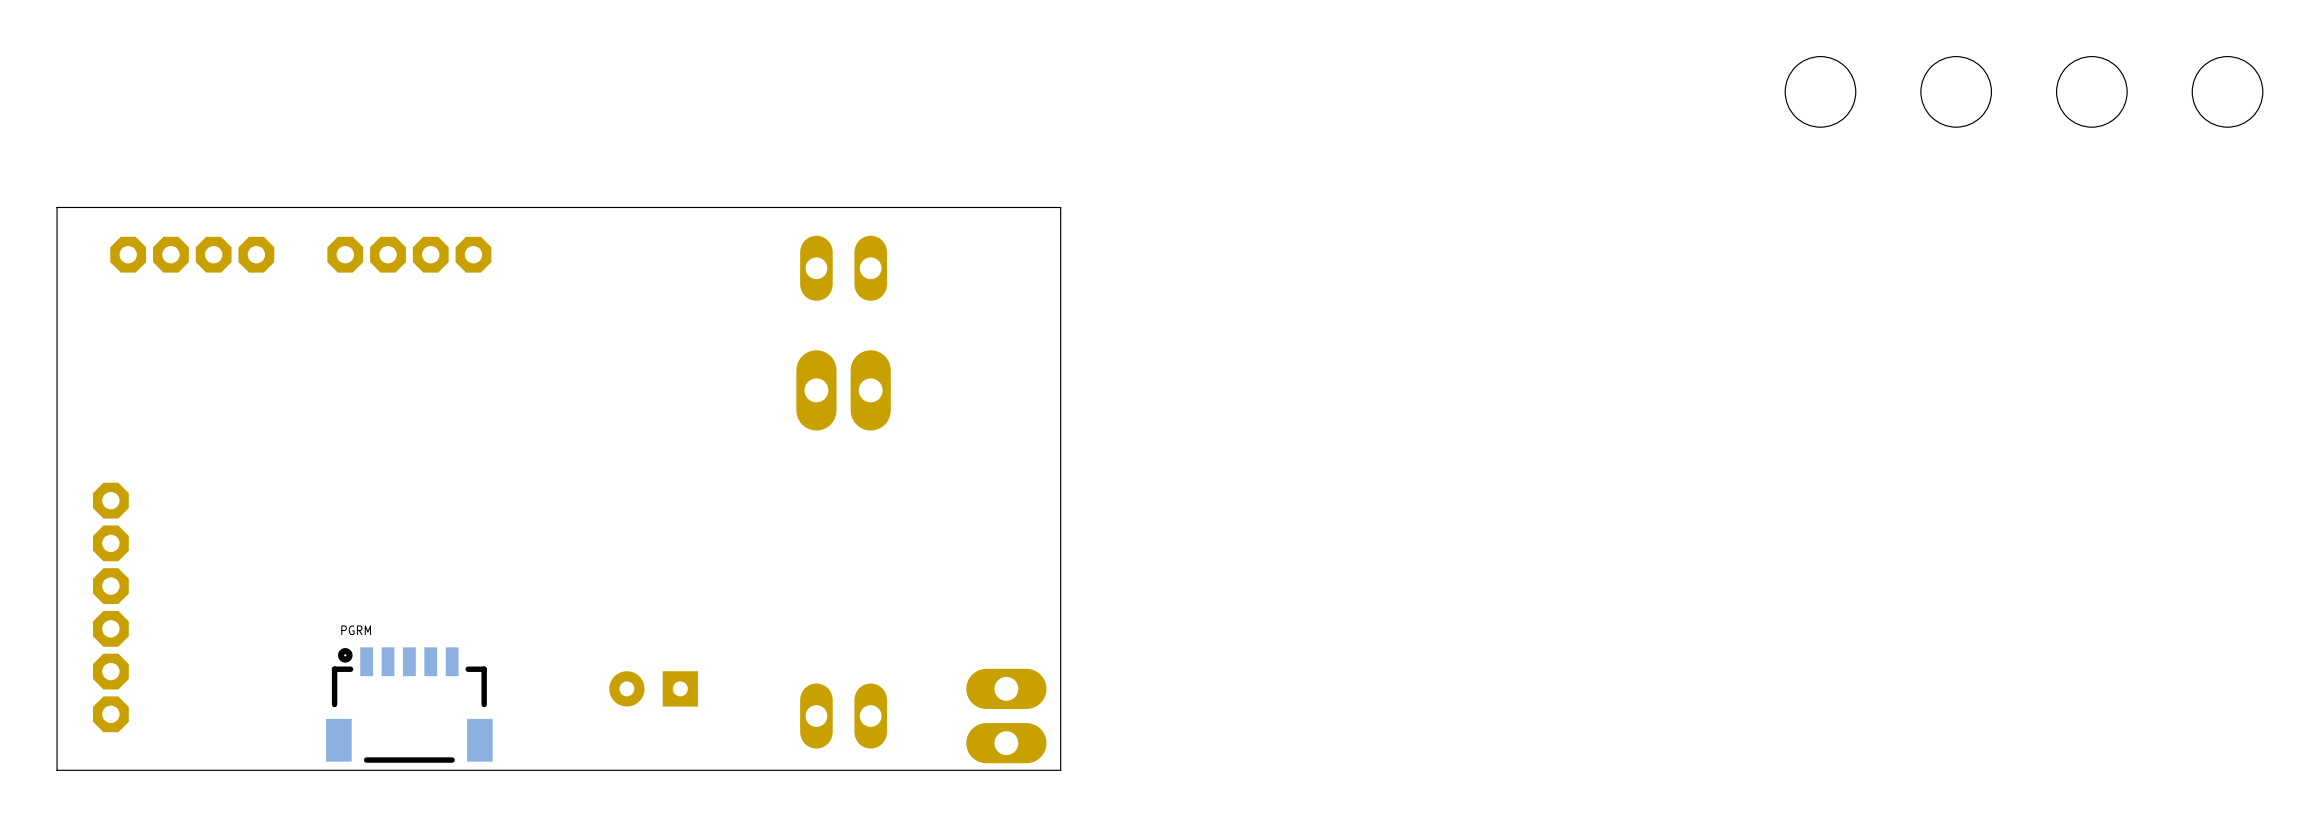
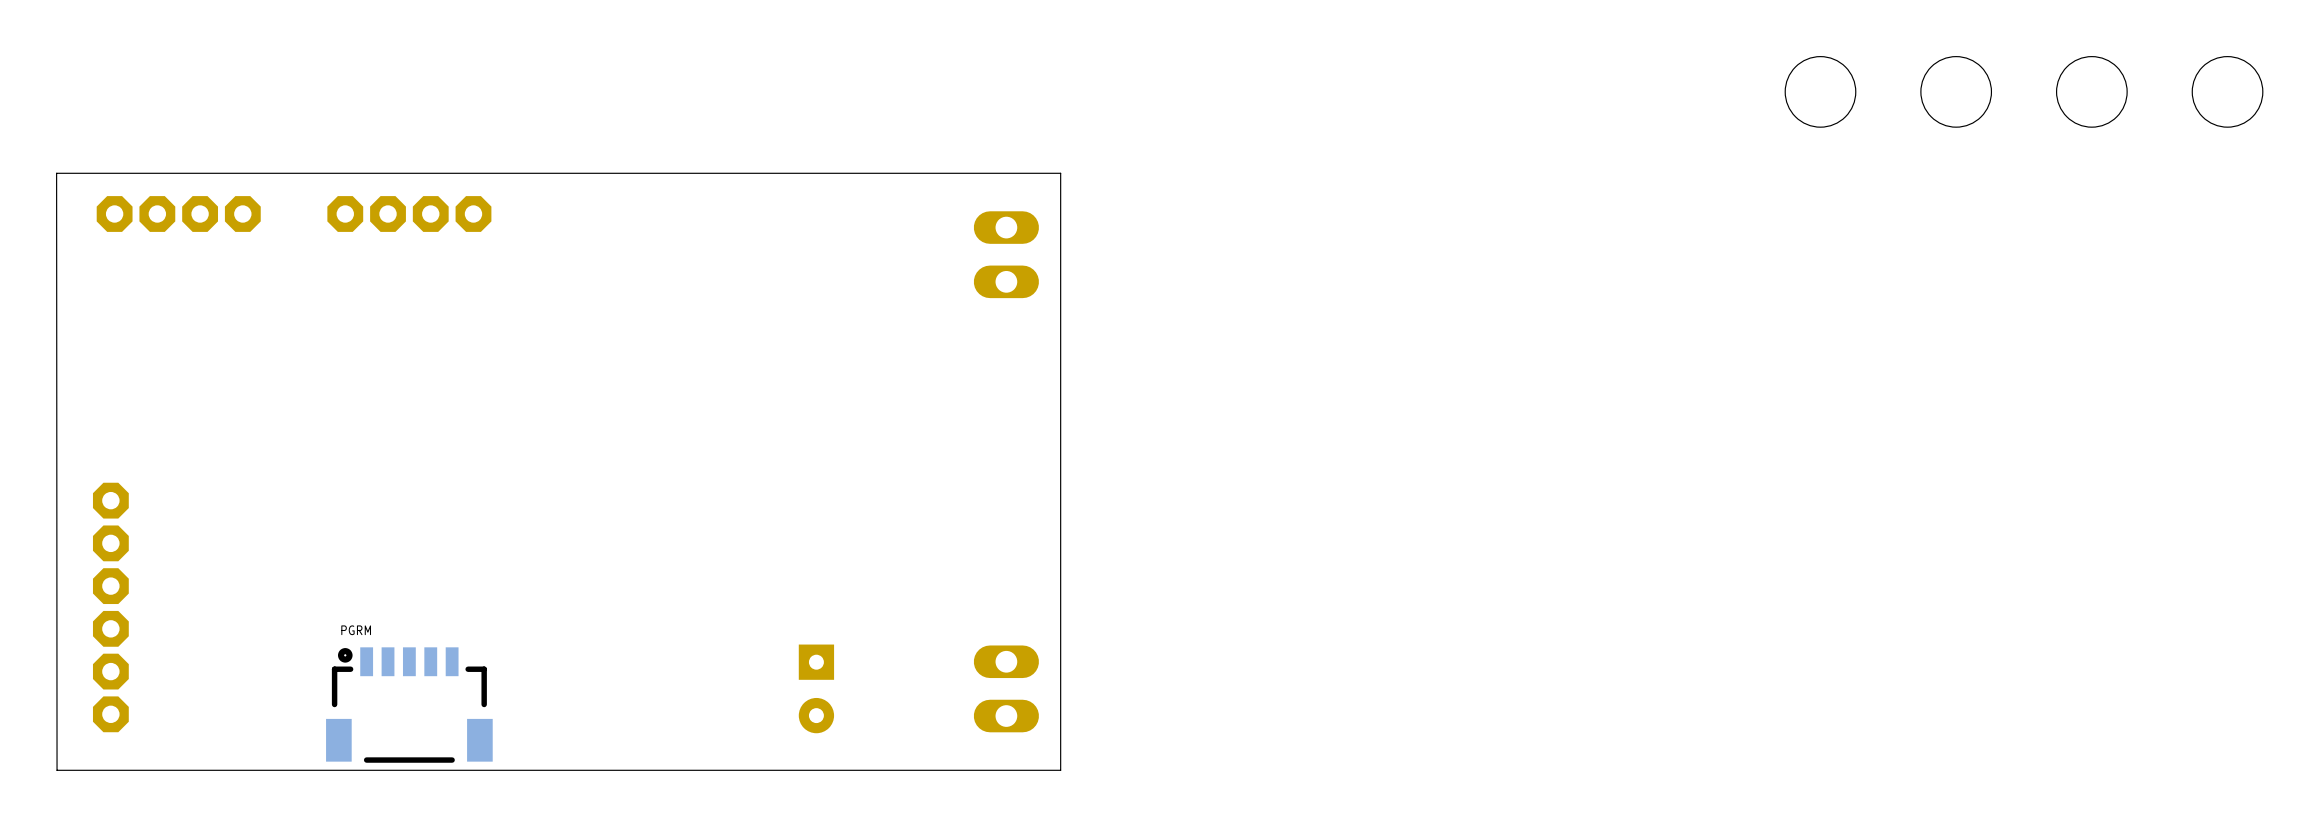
board edge: (1060, 207) (57, 207) (57, 770) -> (1060, 207) (1060, 173) (56, 173) (57, 770)
part position: (192, 254) -> (178, 214)
part position: (409, 254) -> (409, 214)
part rotation: 0° (843, 268) -> 90° clockwise (1006, 254)
part position: (843, 268) -> (1006, 254)
part: (843, 390) -> none
part rotation: 0° (653, 688) -> 90° counterclockwise (816, 688)
part position: (653, 688) -> (816, 688)
part rotation: 0° (843, 716) -> 90° clockwise (1006, 688)
part position: (843, 716) -> (1006, 688)
part: (1006, 716) -> none

